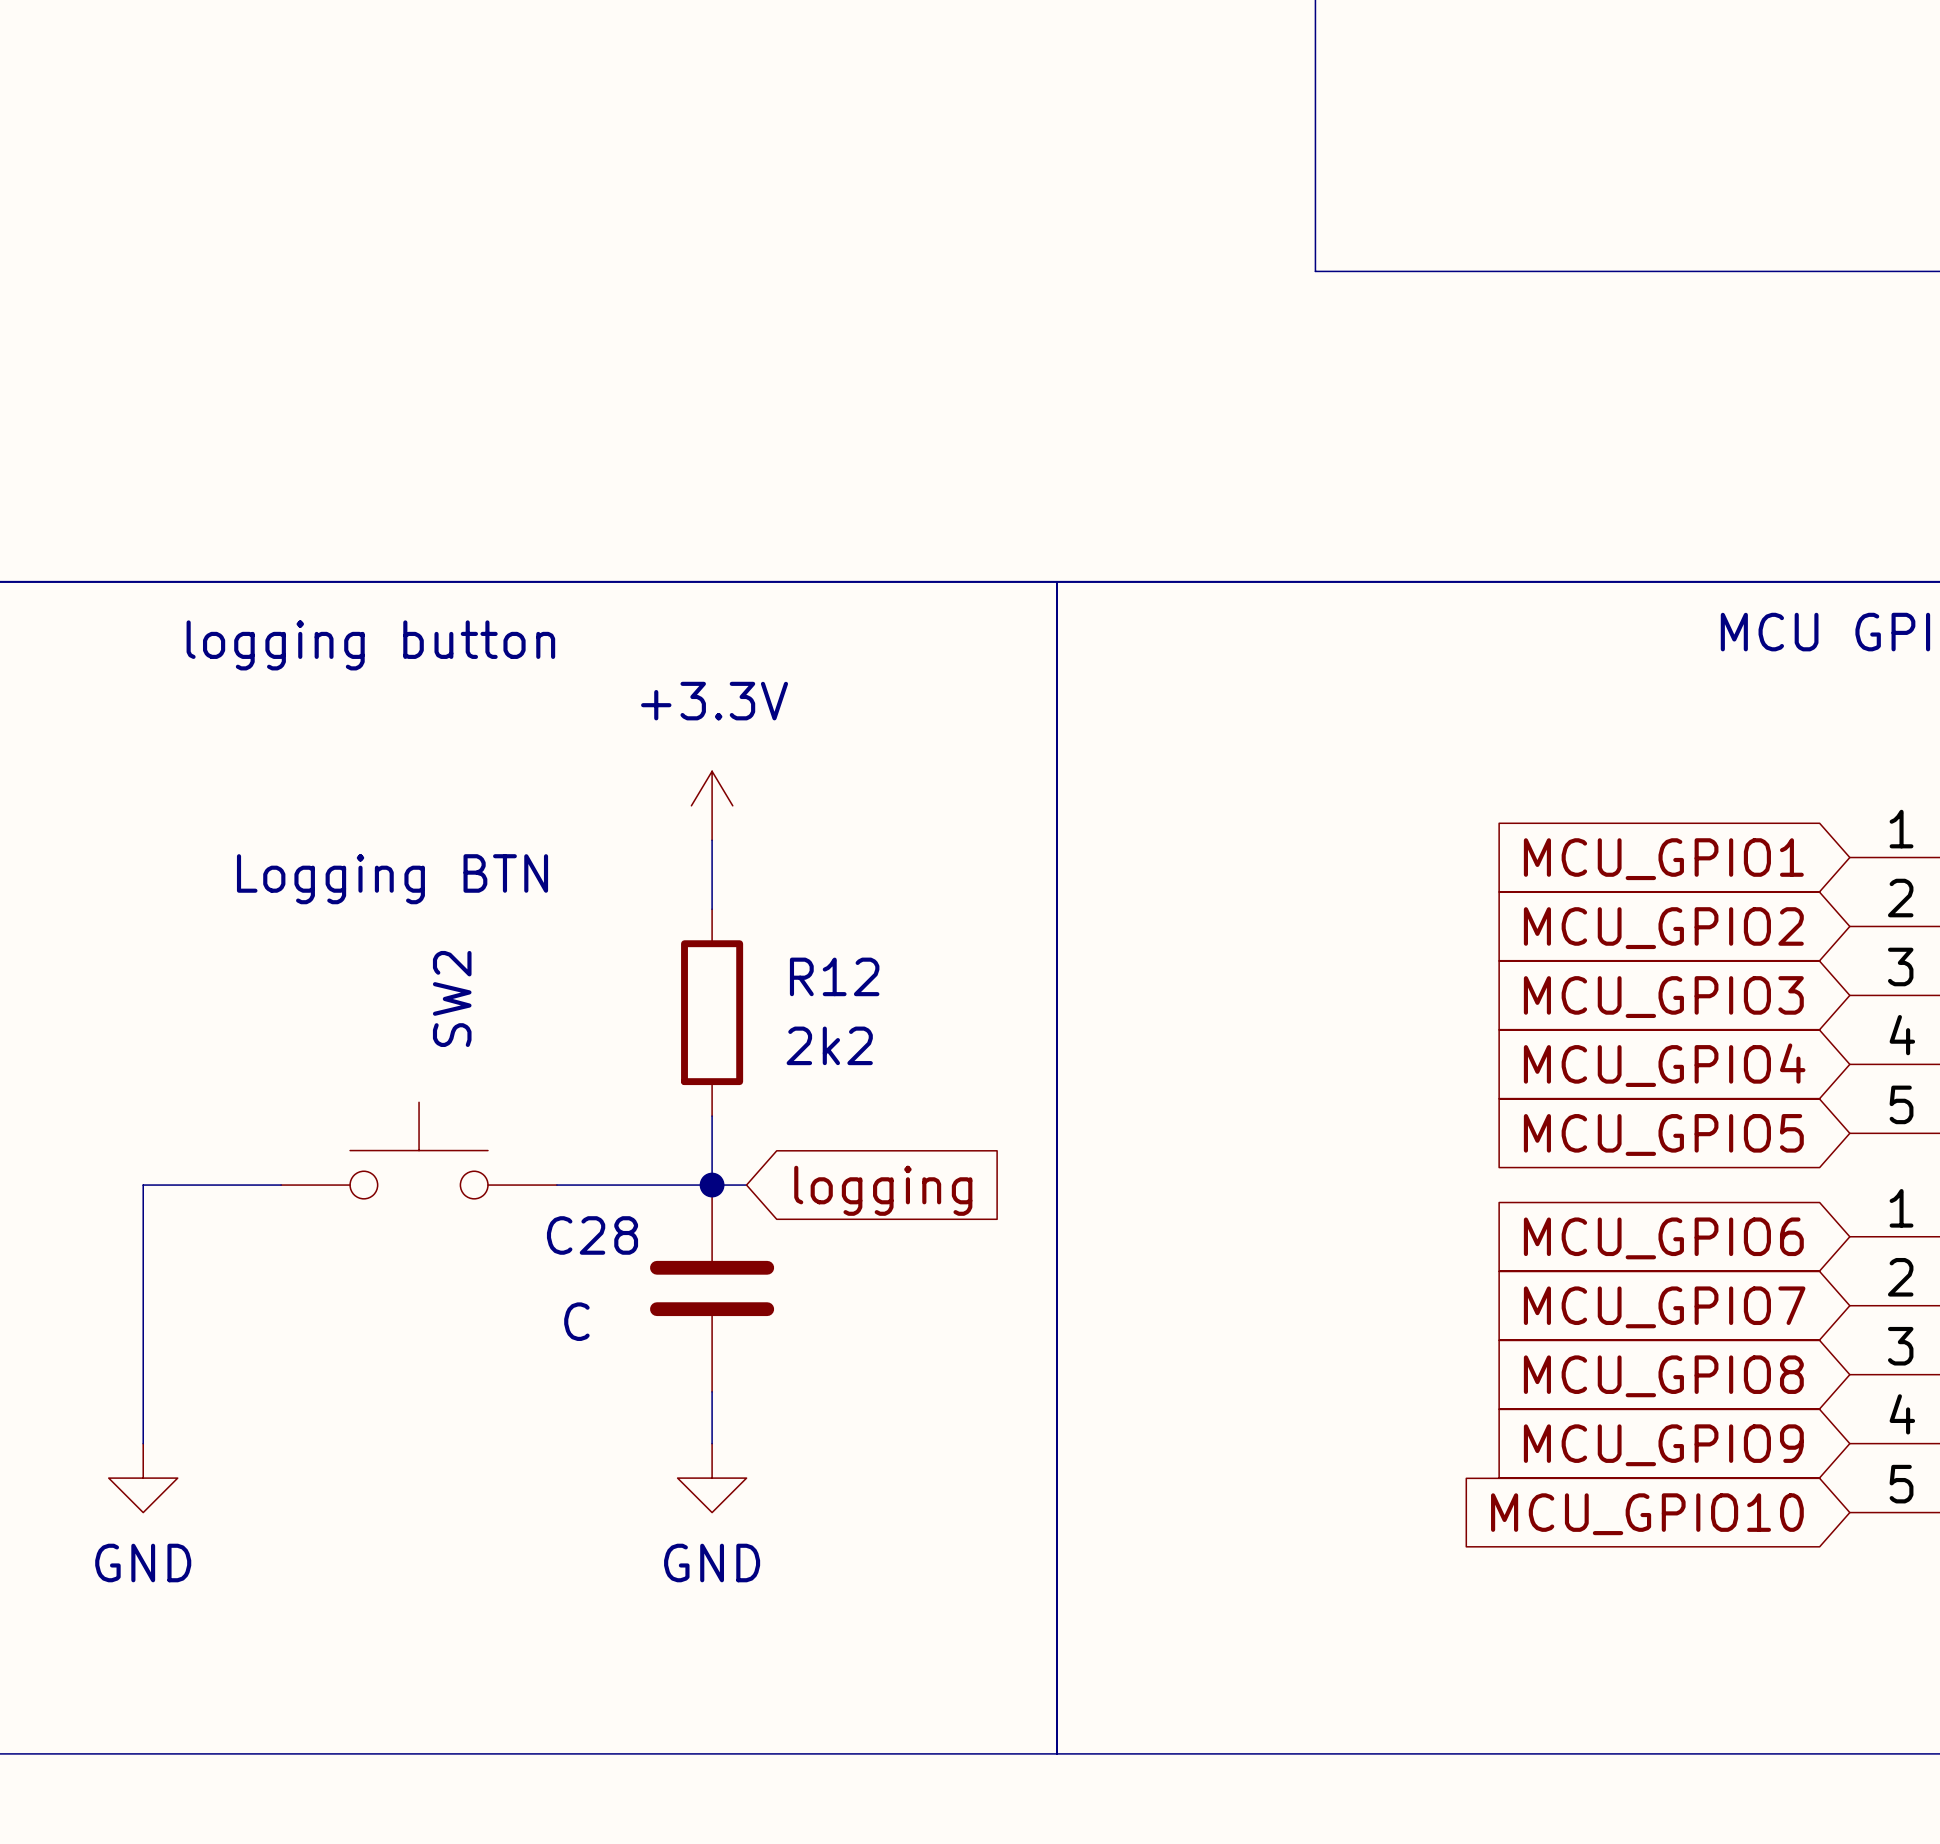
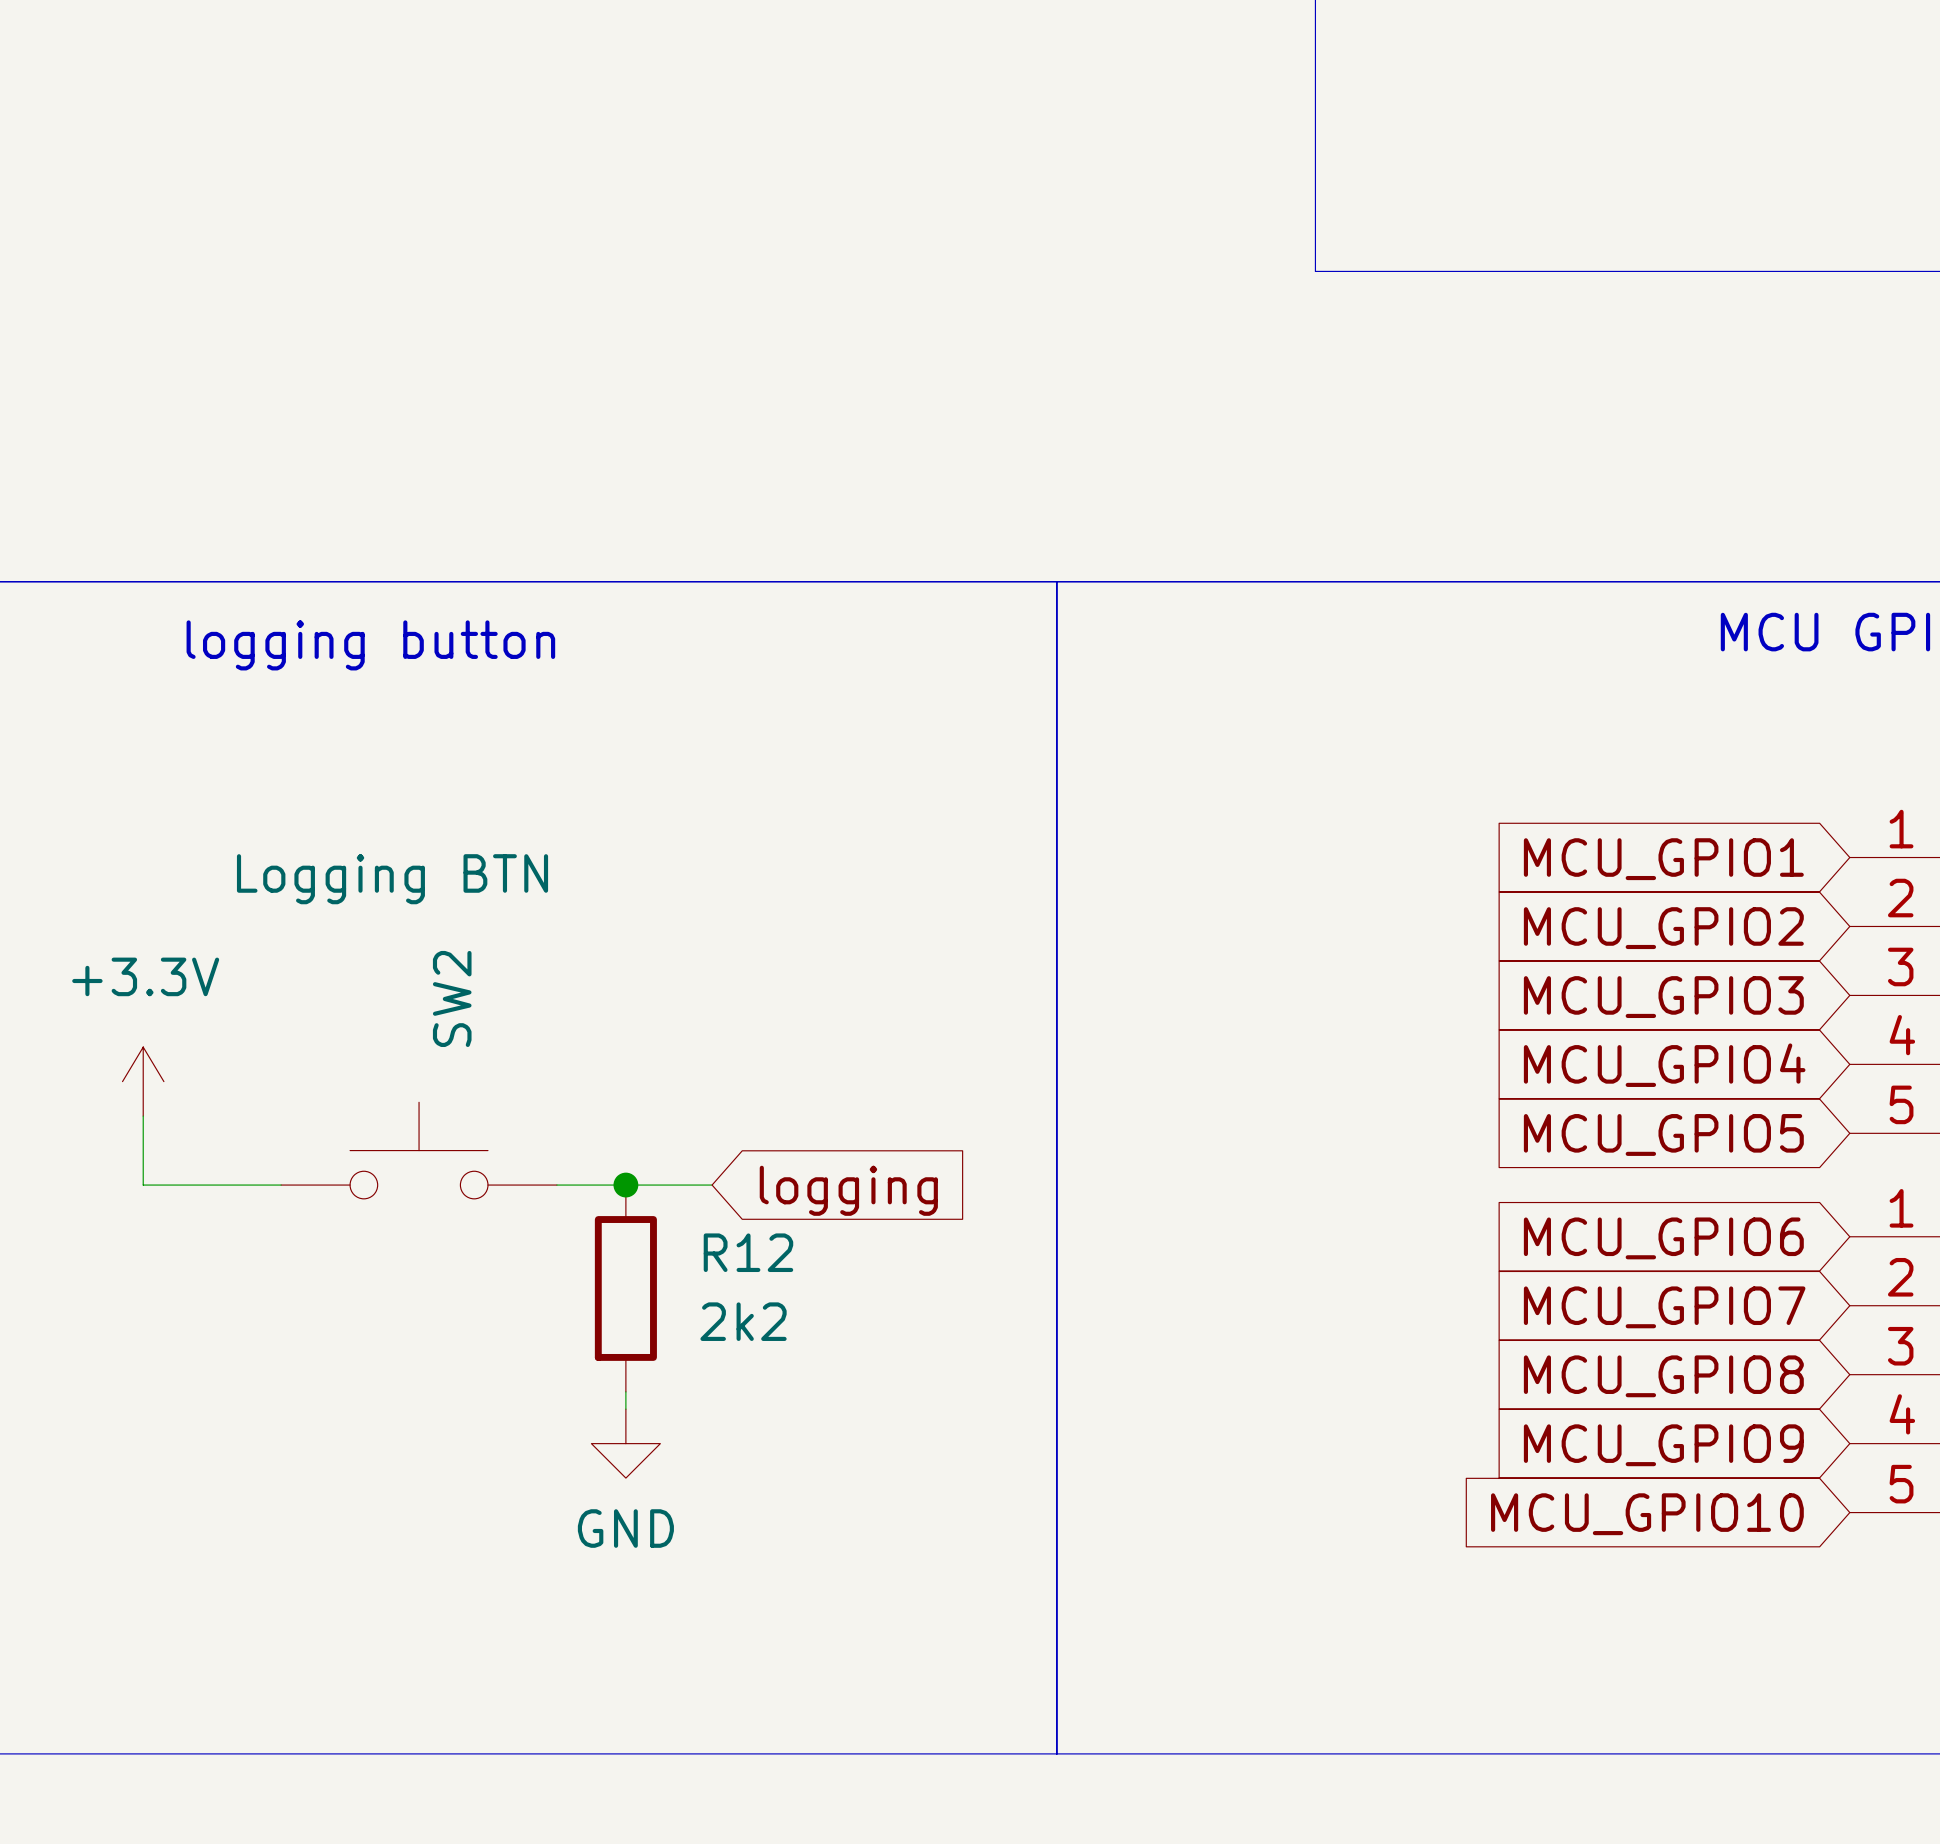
power symbol position: +3.3V (712, 805) -> +3.3V (143, 1081)
wire: (712, 840) (712, 909) -> none
R12 position: (712, 1012) -> (625, 1288)
wire: (712, 1116) (712, 1185) (746, 1185) -> none
wire: (143, 1185) (143, 1443) -> (143, 1185) (143, 1116)
junction position: (712, 1185) -> (625, 1185)
global label position: logging (883, 1190) -> logging (848, 1190)
C28: C (712, 1288) -> none
wire: none -> (625, 1391) (625, 1409)
wire: (712, 1391) (712, 1443) -> none
power symbol: GND (143, 1478) -> none
power symbol position: GND (712, 1478) -> GND (625, 1443)

